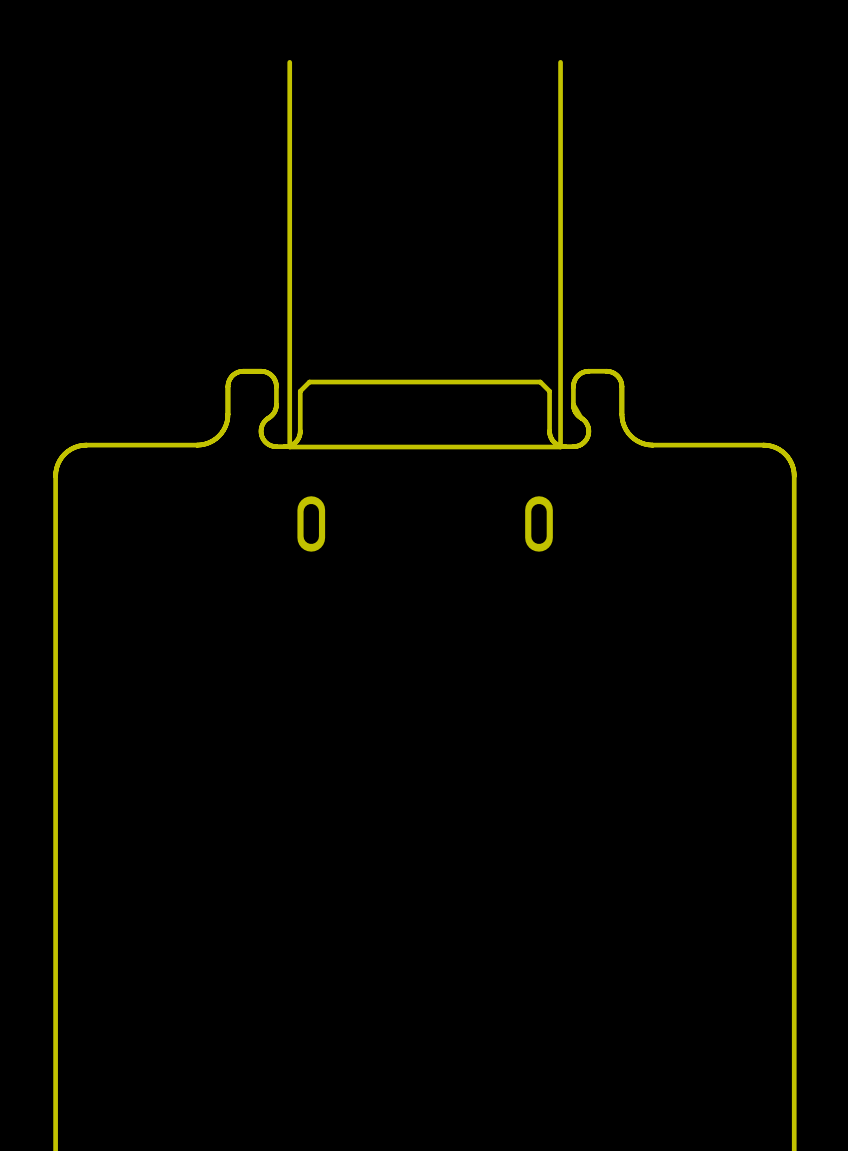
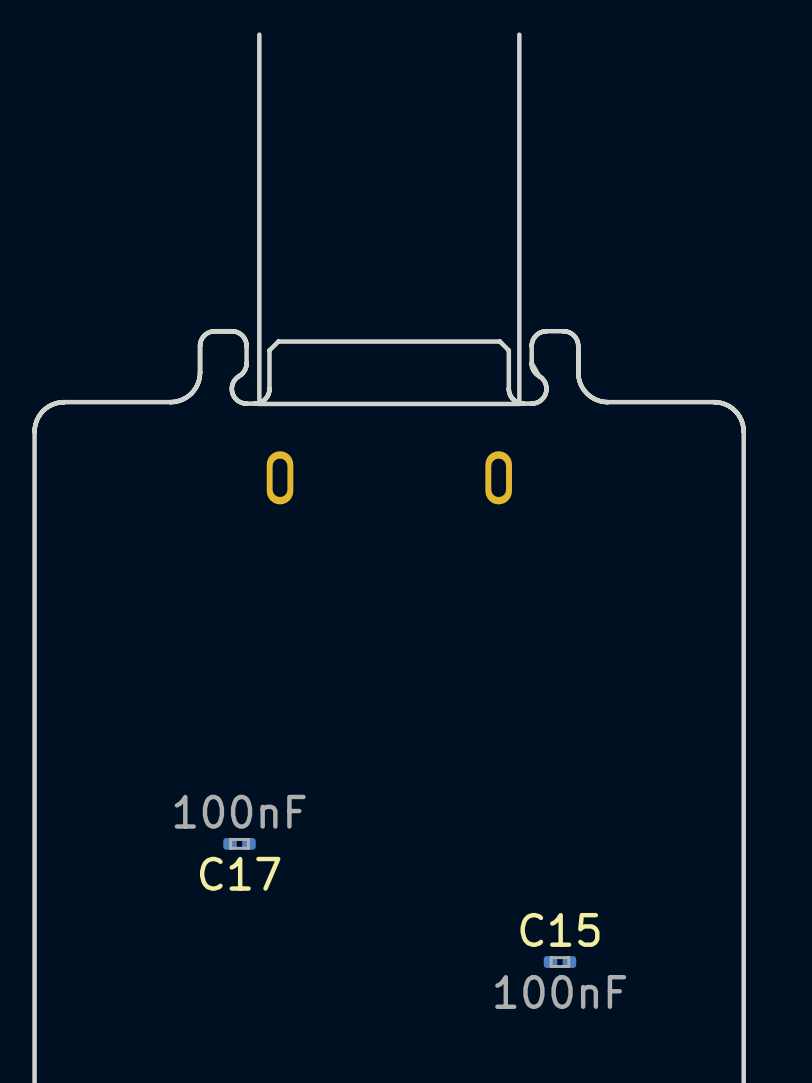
C17: none -> 100nF (239, 843)
C15: none -> 100nF (559, 962)

